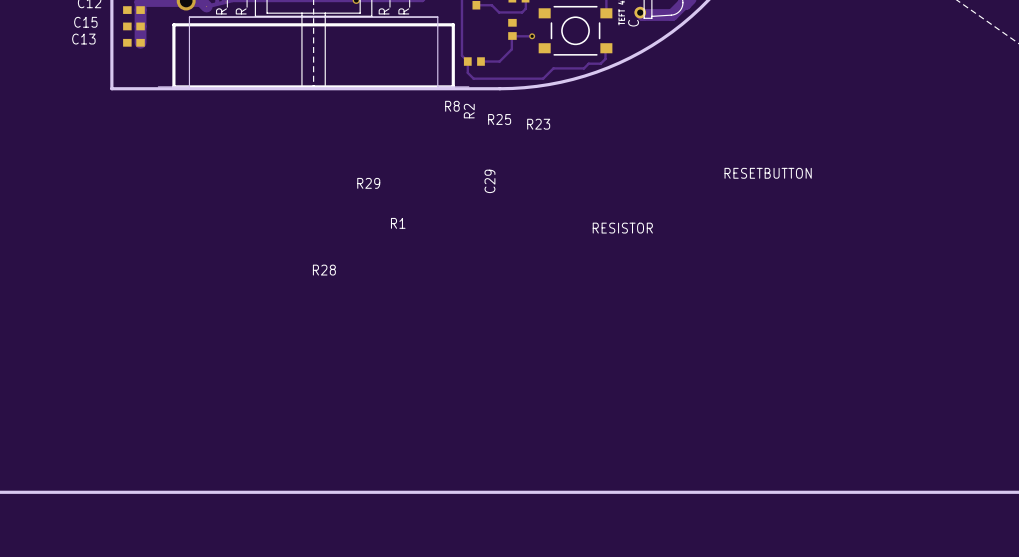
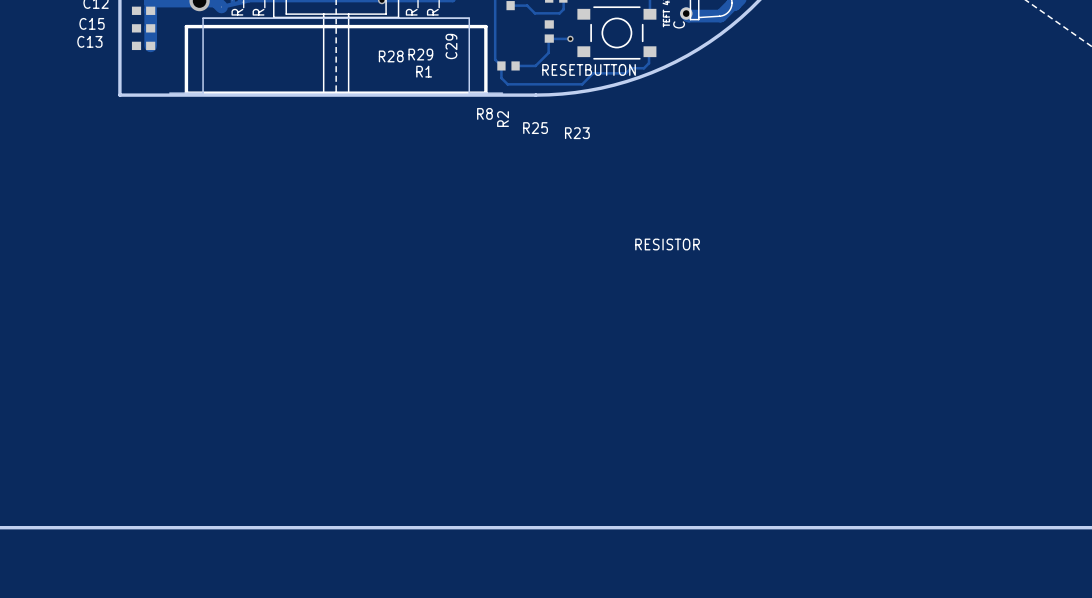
RESETBUTTON name position: RESETBUTTON (768, 173) -> RESETBUTTON (589, 69)
C29 name position: C29 (489, 181) -> C29 (451, 46)
R29 name position: R29 (368, 183) -> R29 (420, 54)
R1 name position: R1 (398, 223) -> R1 (424, 71)
R28 name position: R28 (324, 270) -> R28 (391, 56)

